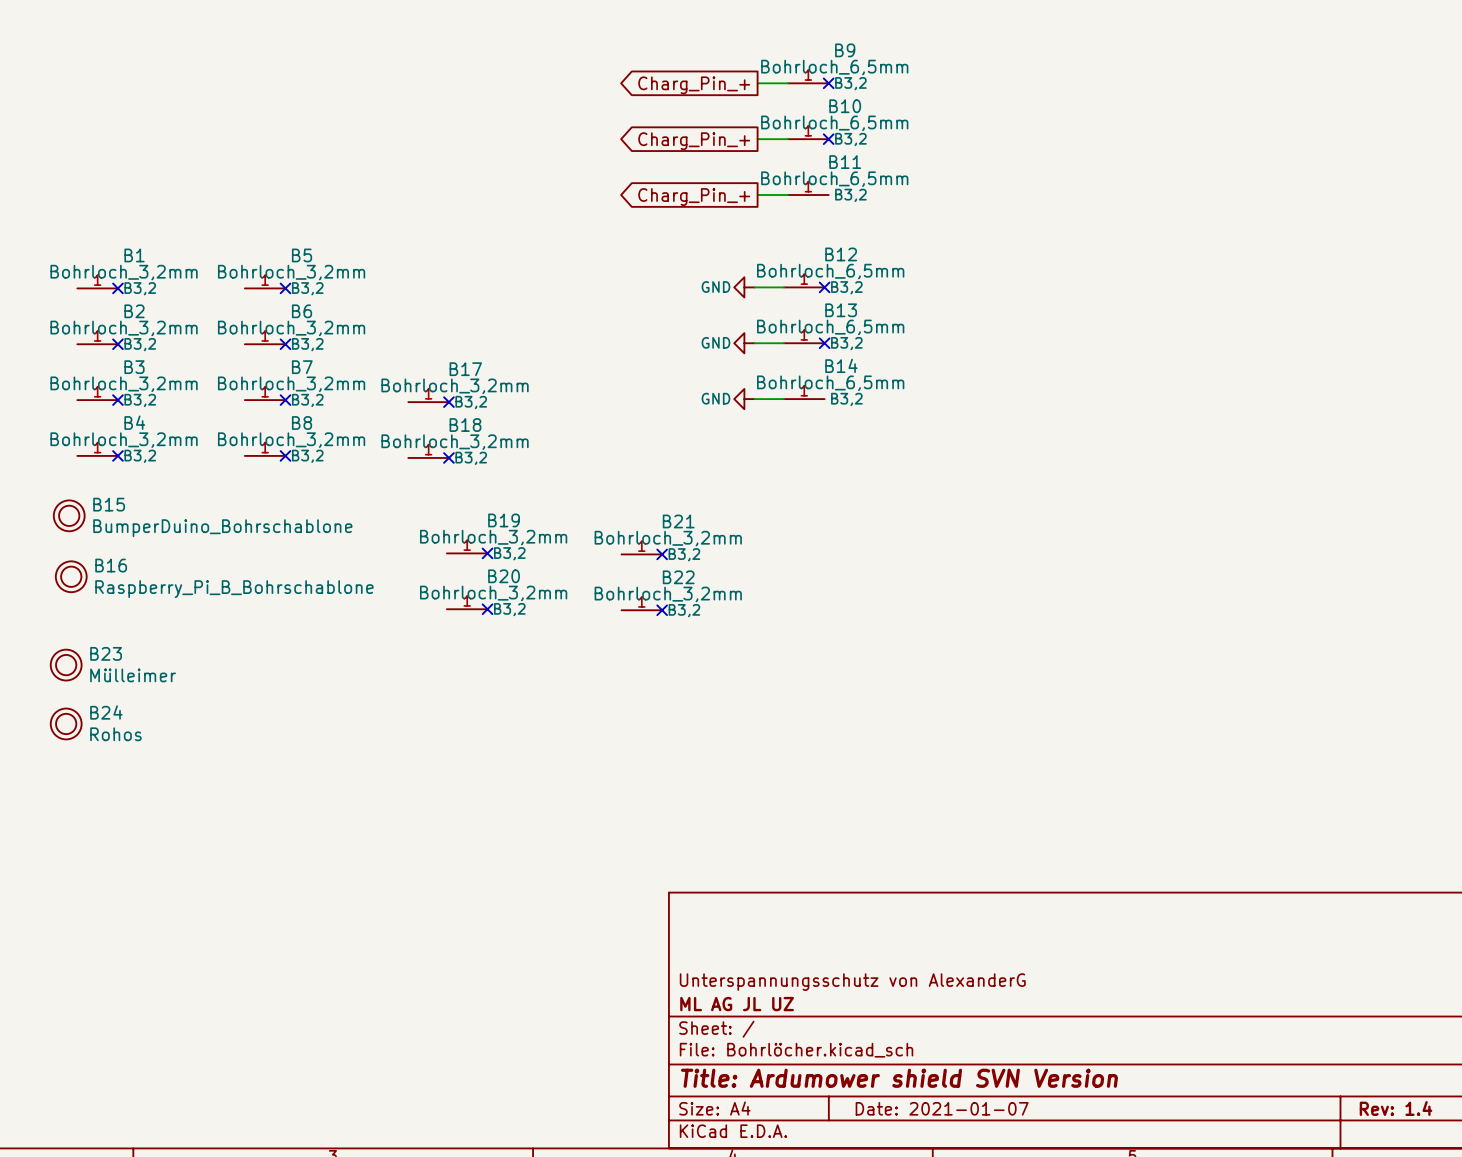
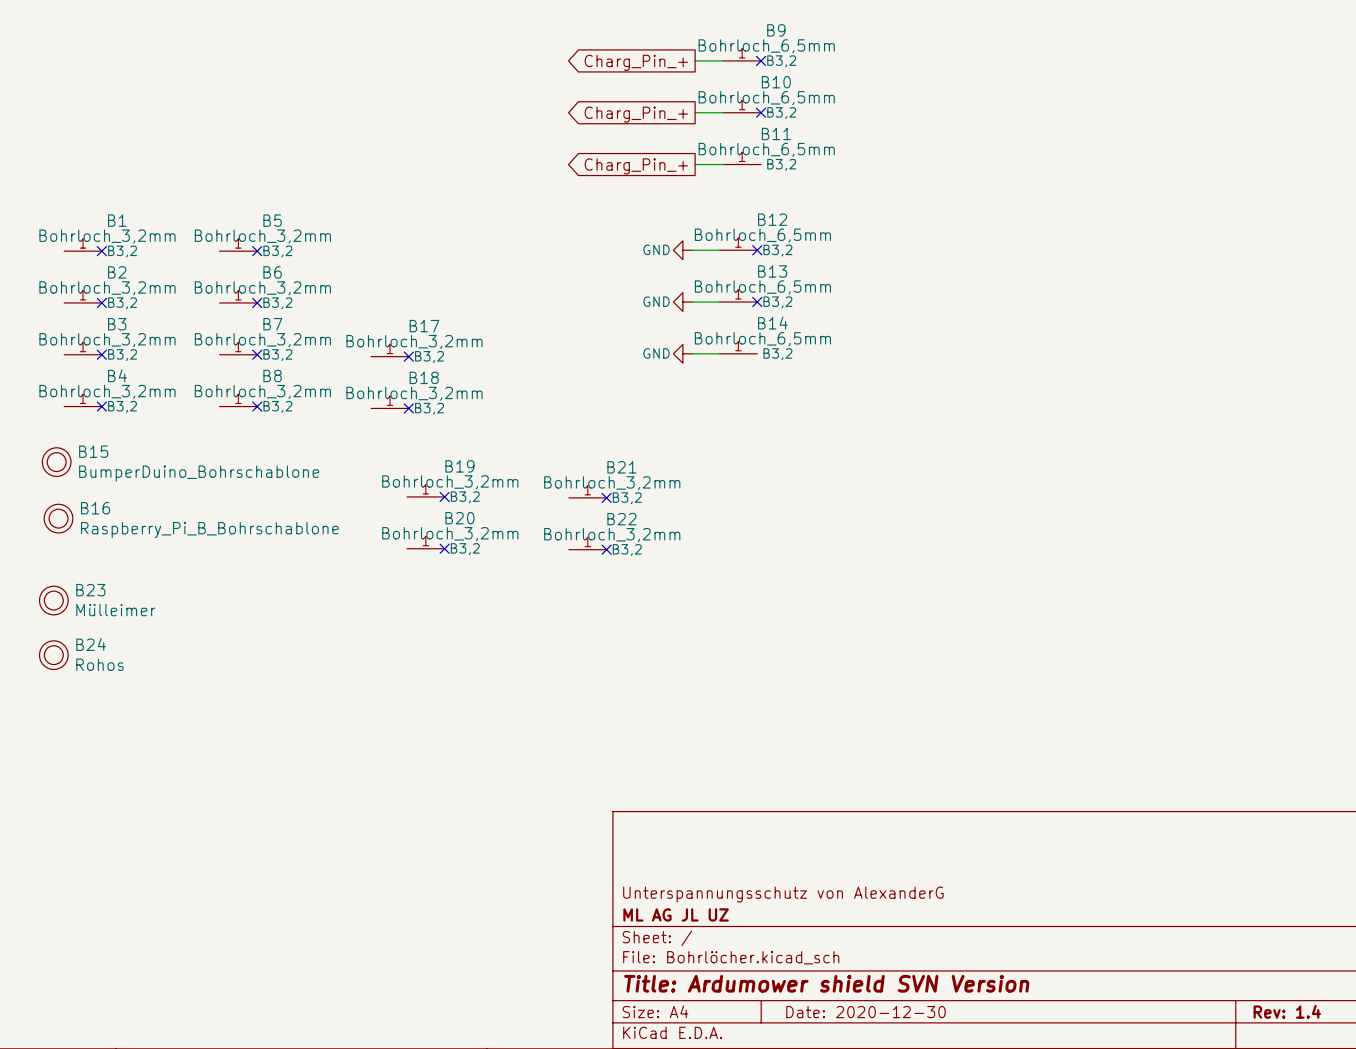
title block: Date: 2021-01-07 (942, 1108) -> Date: 2020-12-30 (866, 1012)

